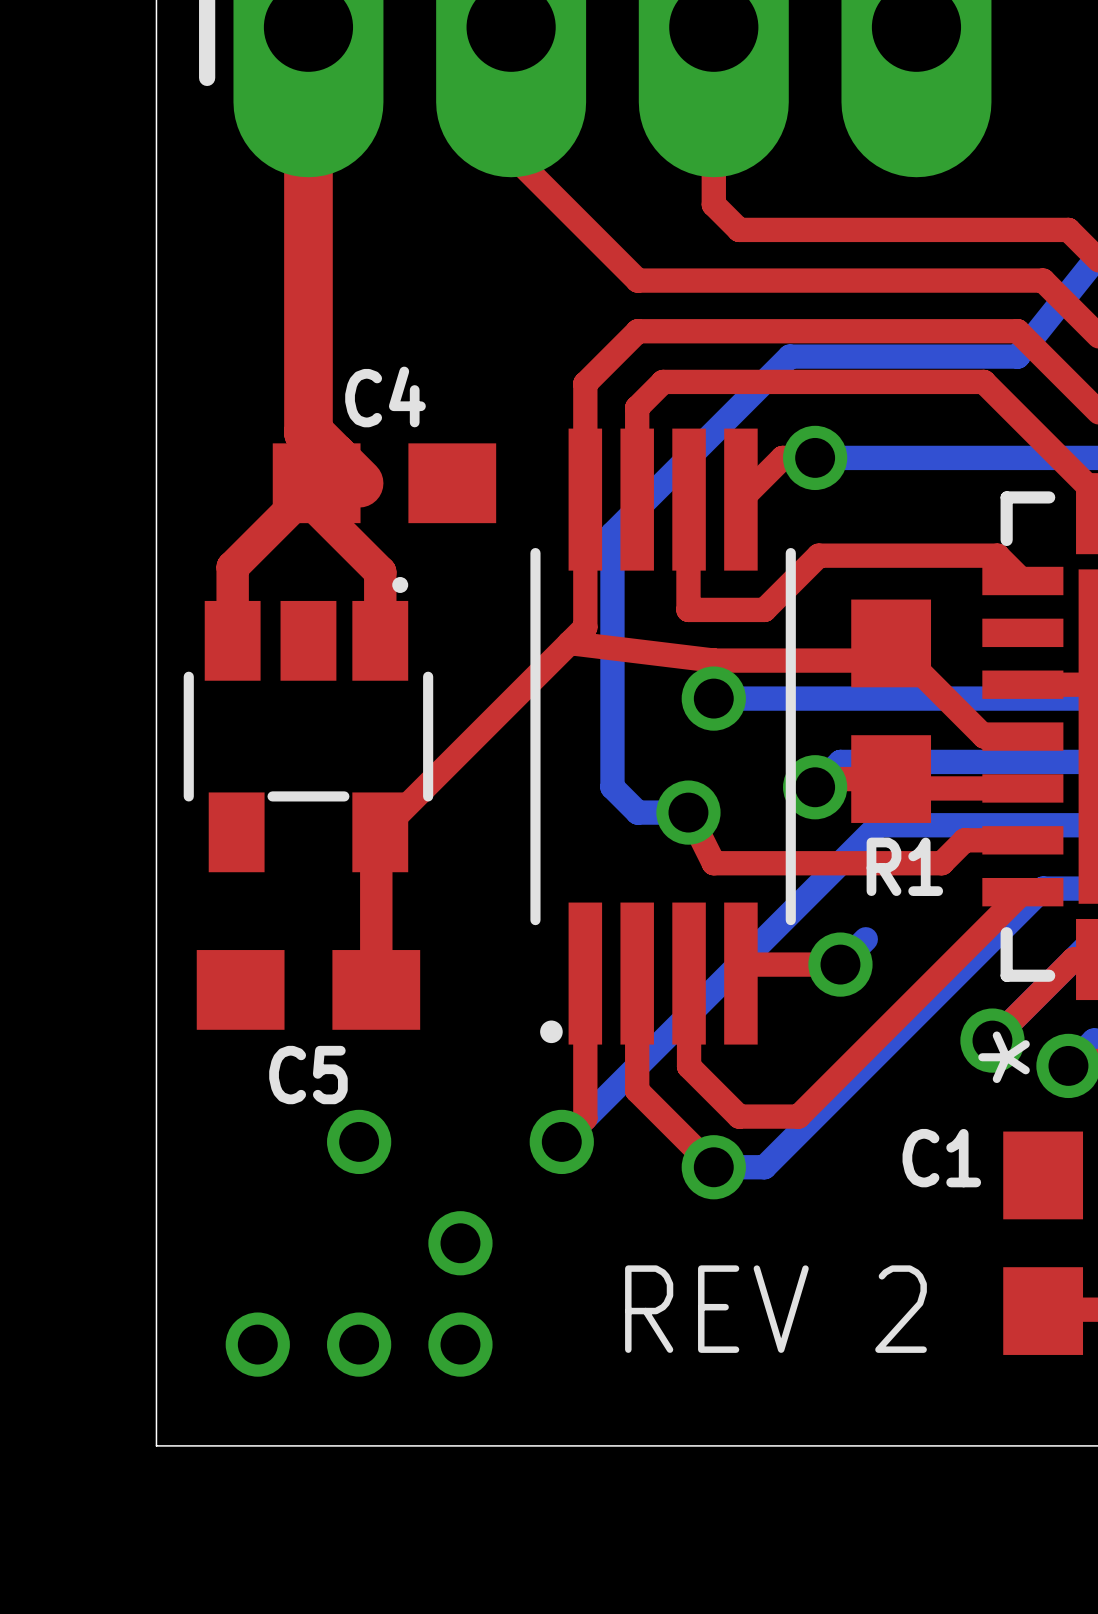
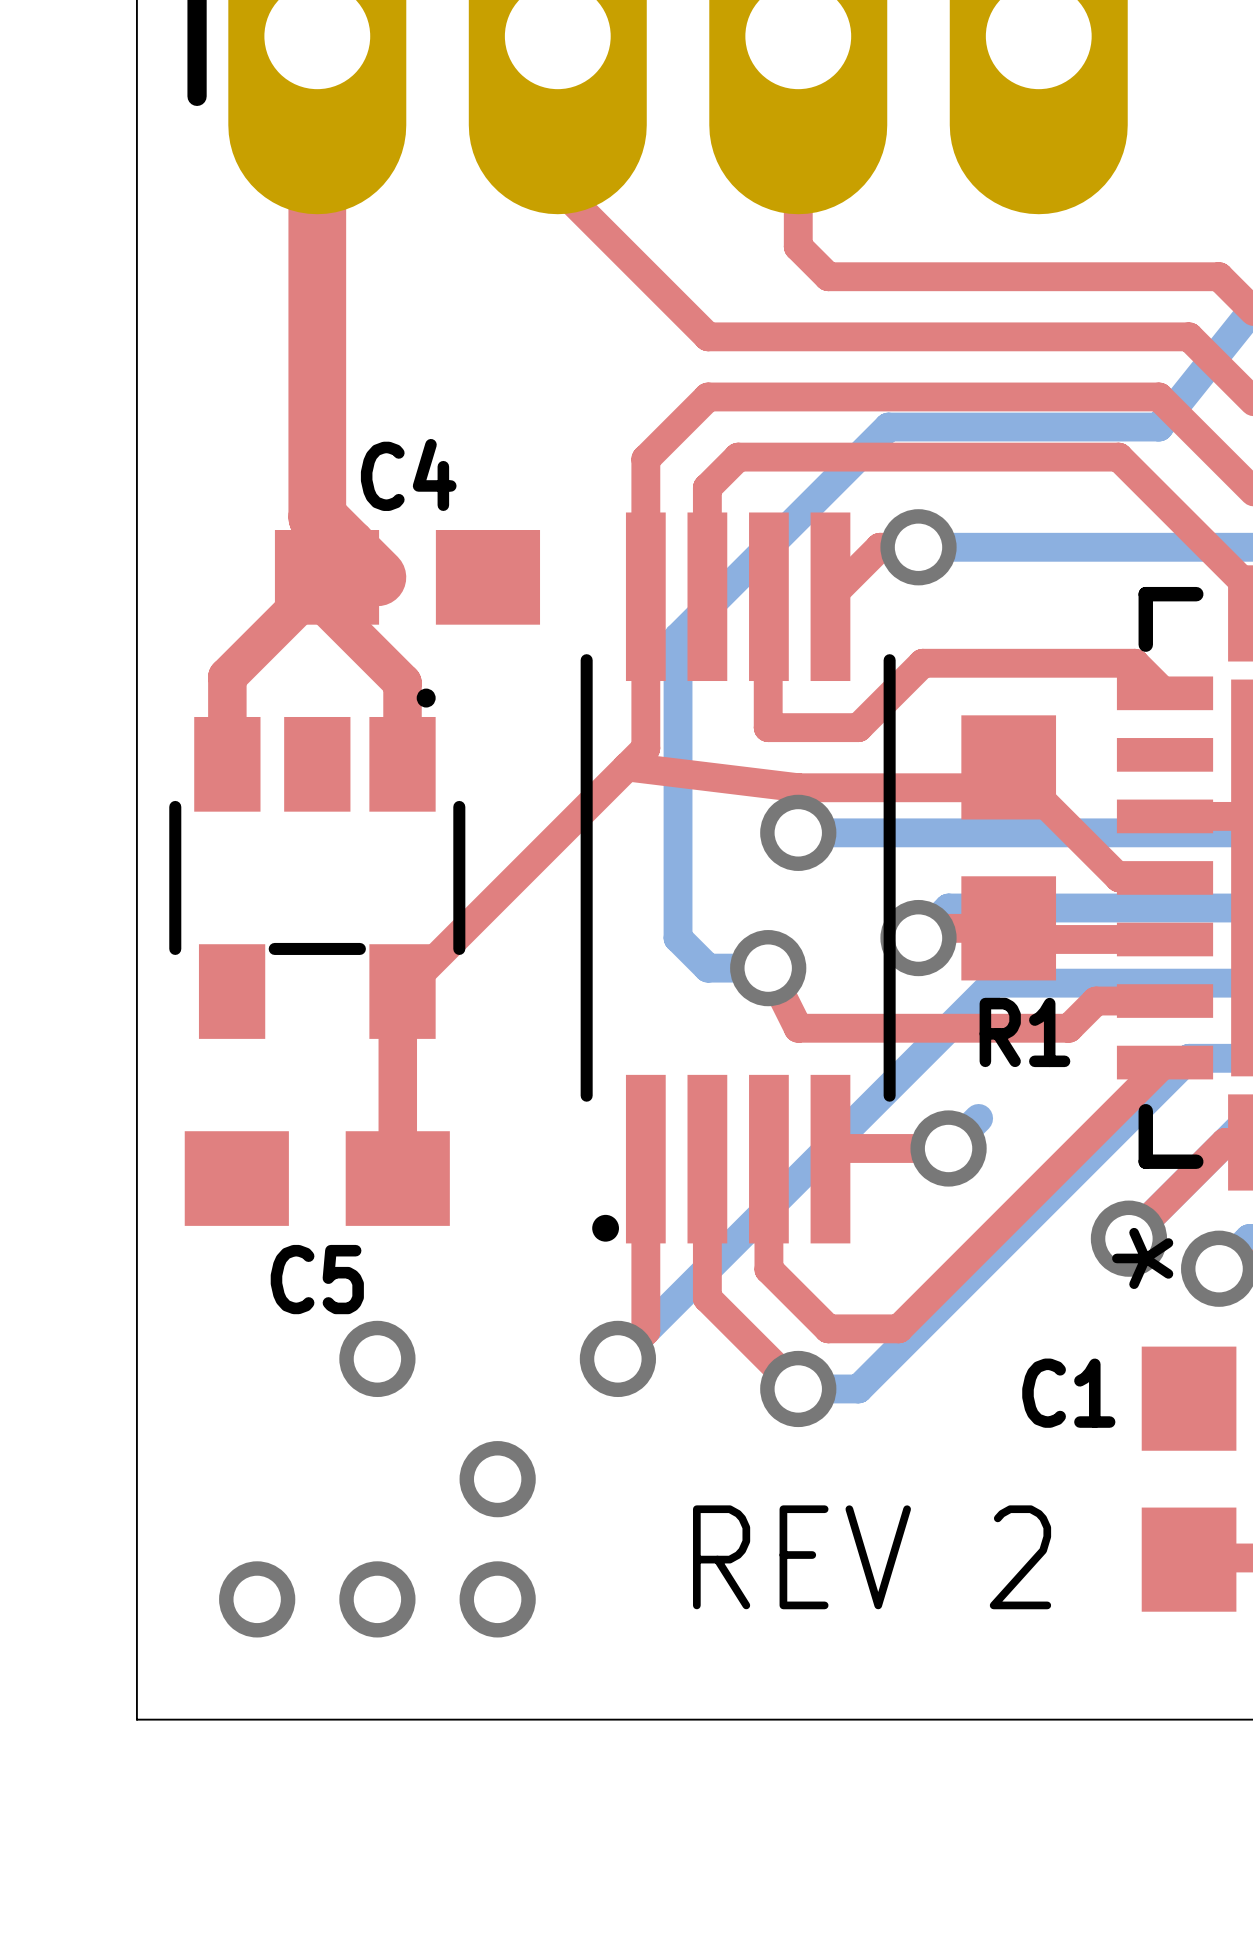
C1 name position: C1 (941, 1158) -> C1 (1068, 1393)

